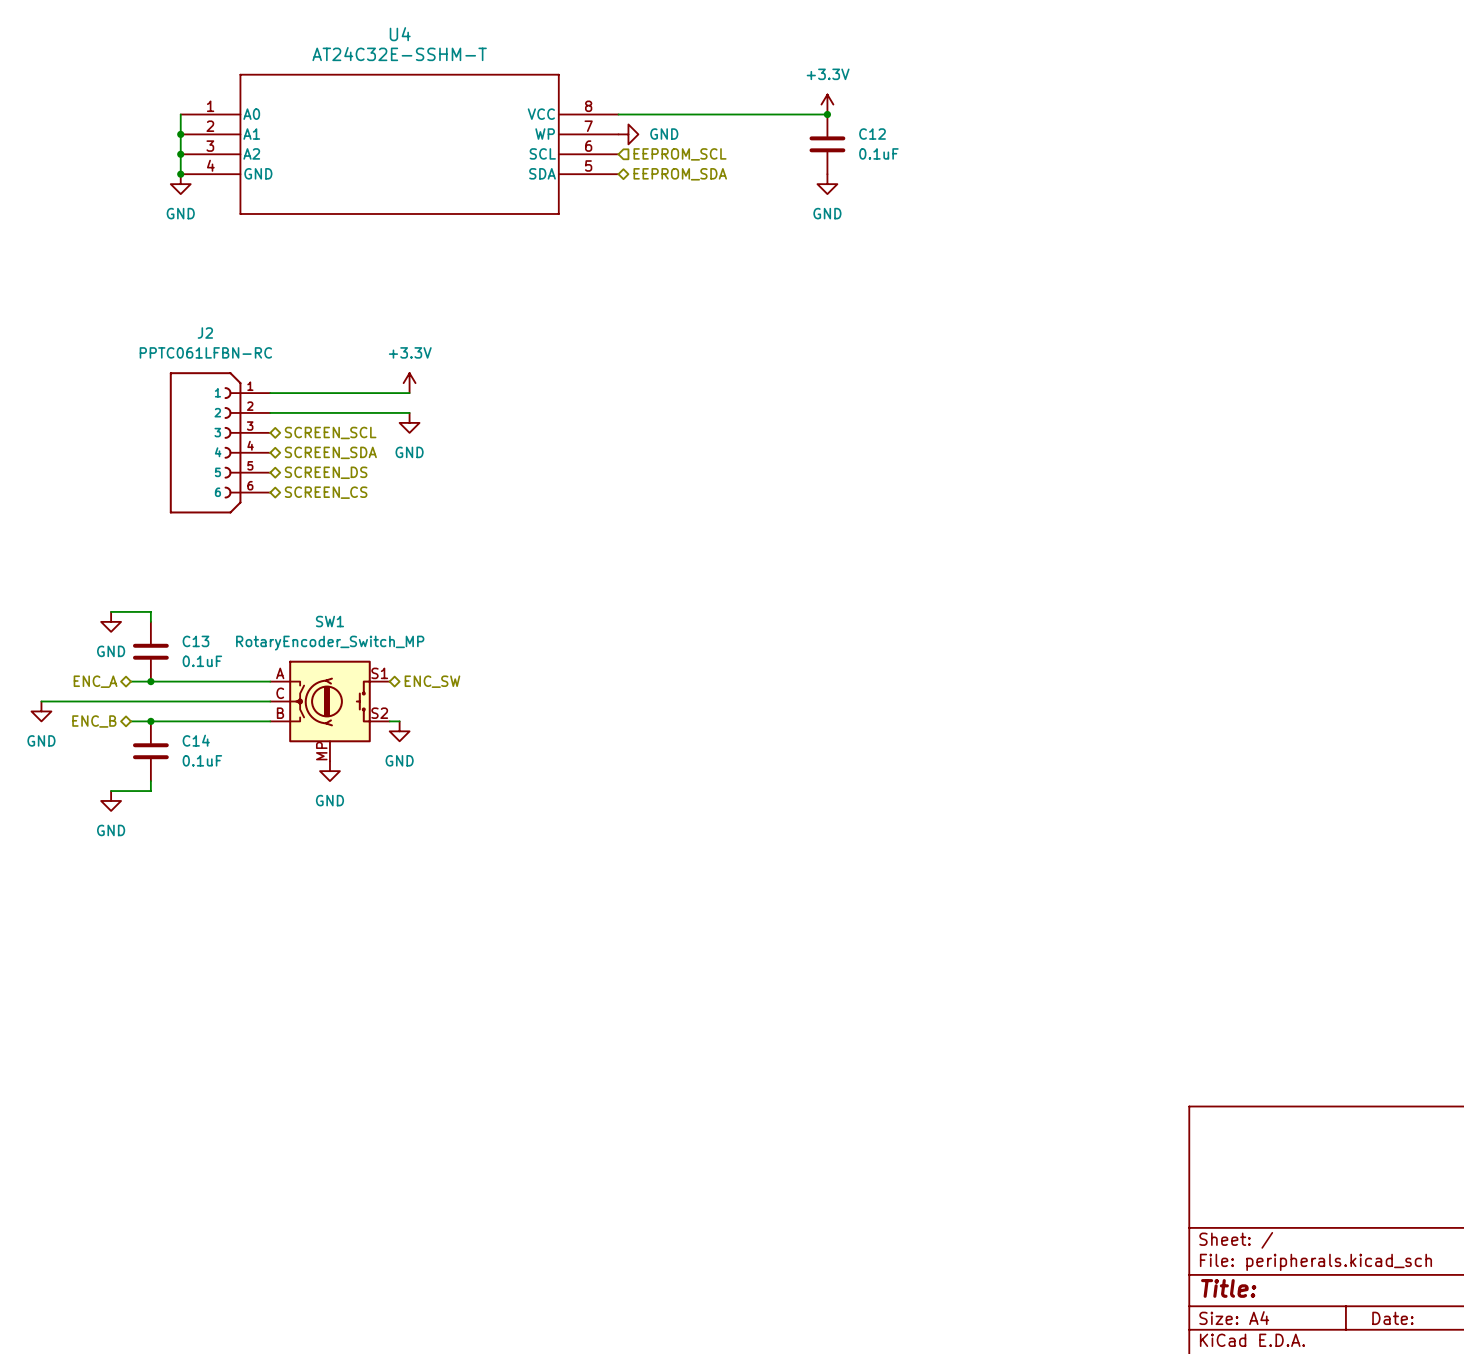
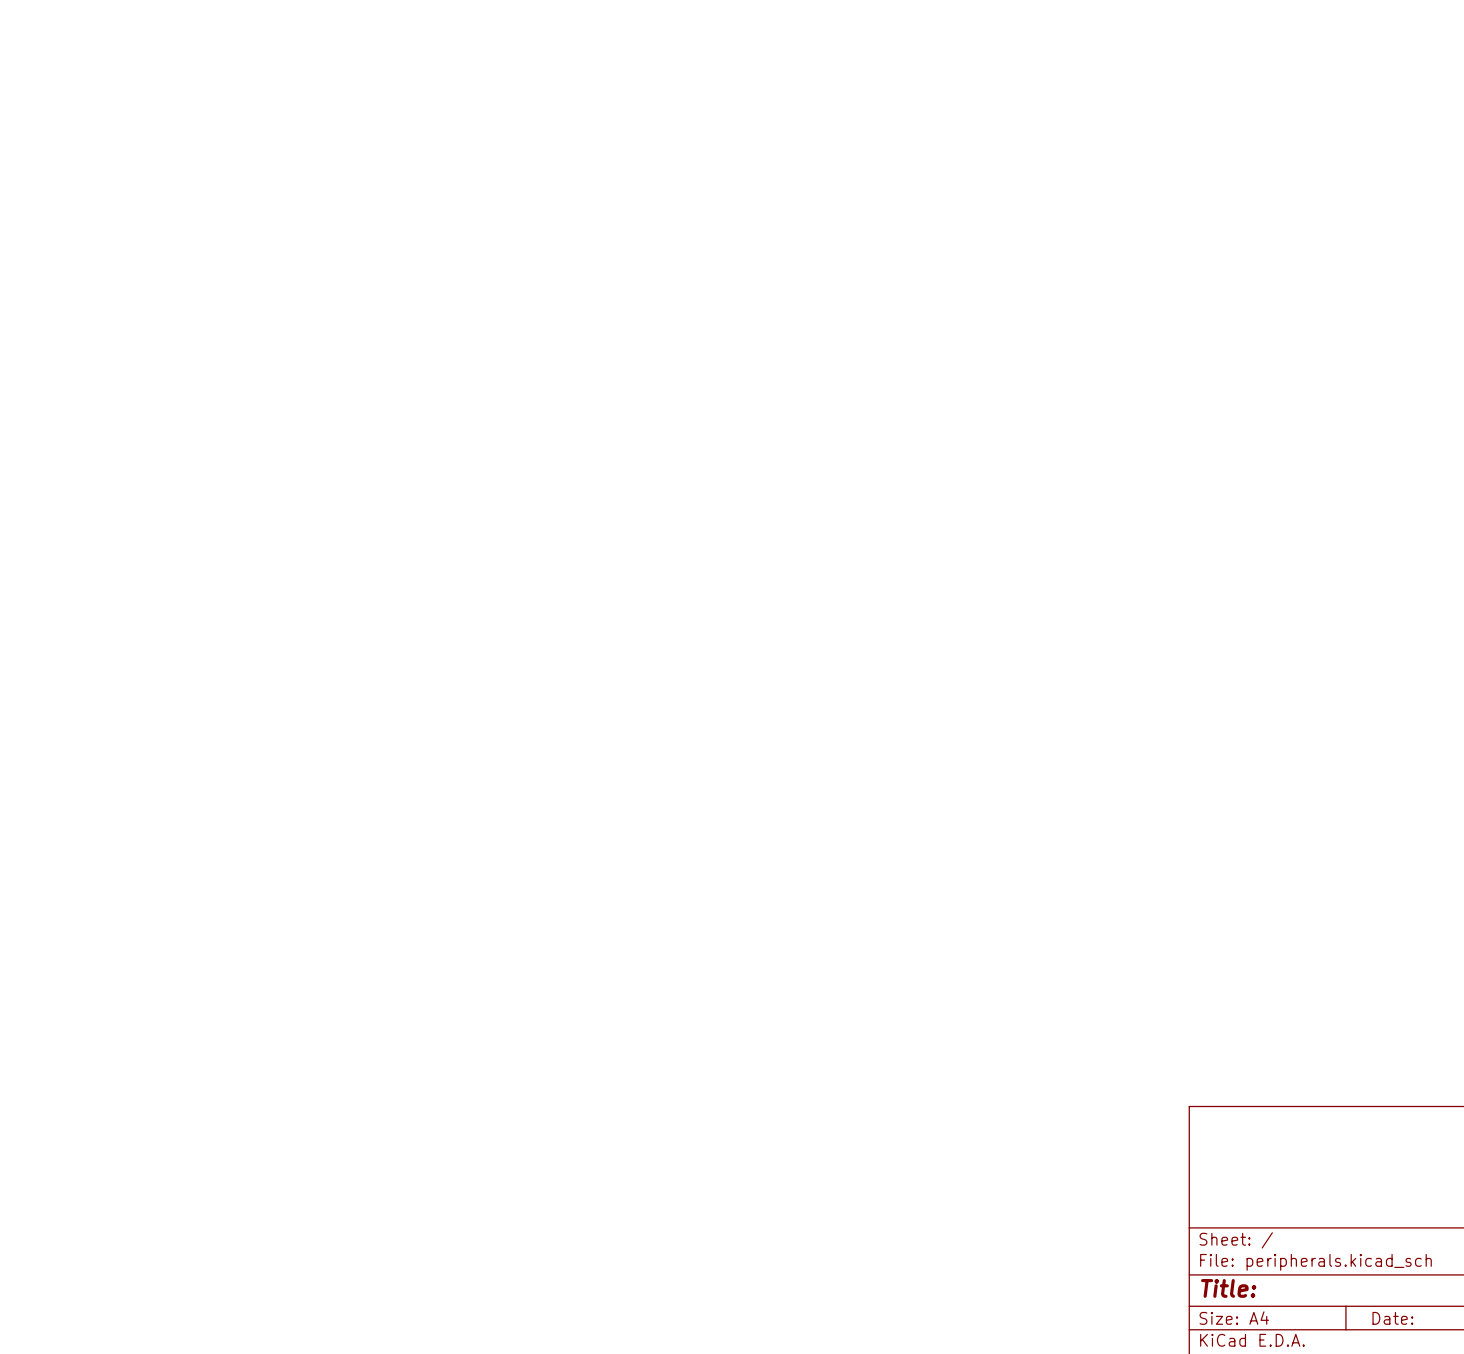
power symbol: +3.3V (827, 104) -> none
wire: (180, 114) (180, 174) -> none
wire: (618, 114) (827, 114) -> none
junction: (827, 114) -> none
junction: (180, 134) -> none
power symbol: GND (628, 134) -> none
U4: AT24C32E-SSHM-T (399, 144) -> none
C12: 0.1uF (827, 144) -> none
junction: (180, 154) -> none
hierarchical label: EEPROM_SCL (680, 154) -> none
junction: (180, 174) -> none
hierarchical label: EEPROM_SDA (680, 174) -> none
power symbol: GND (180, 184) -> none
power symbol: GND (827, 184) -> none
power symbol: +3.3V (409, 383) -> none
wire: (270, 393) (409, 393) -> none
wire: (270, 412) (409, 412) -> none
power symbol: GND (409, 422) -> none
hierarchical label: SCREEN_SCL (330, 432) -> none
J2: PPTC061LFBN-RC (220, 442) -> none
hierarchical label: SCREEN_SDA (330, 452) -> none
hierarchical label: SCREEN_DS (326, 472) -> none
hierarchical label: SCREEN_CS (326, 492) -> none
wire: (111, 611) (150, 611) (150, 621) -> none
power symbol: GND (111, 621) -> none
C13: 0.1uF (150, 651) -> none
hierarchical label: ENC_A (95, 681) -> none
wire: (131, 681) (270, 681) -> none
junction: (150, 681) -> none
hierarchical label: ENC_SW (432, 681) -> none
wire: (41, 701) (270, 701) -> none
SW1: RotaryEncoder_Switch_MP (329, 710) -> none
power symbol: GND (41, 711) -> none
hierarchical label: ENC_B (94, 721) -> none
wire: (131, 721) (270, 721) -> none
junction: (150, 721) -> none
wire: (389, 721) (399, 721) -> none
power symbol: GND (399, 731) -> none
C14: 0.1uF (150, 751) -> none
power symbol: GND (329, 771) -> none
wire: (150, 781) (150, 791) (111, 791) -> none
power symbol: GND (111, 800) -> none

